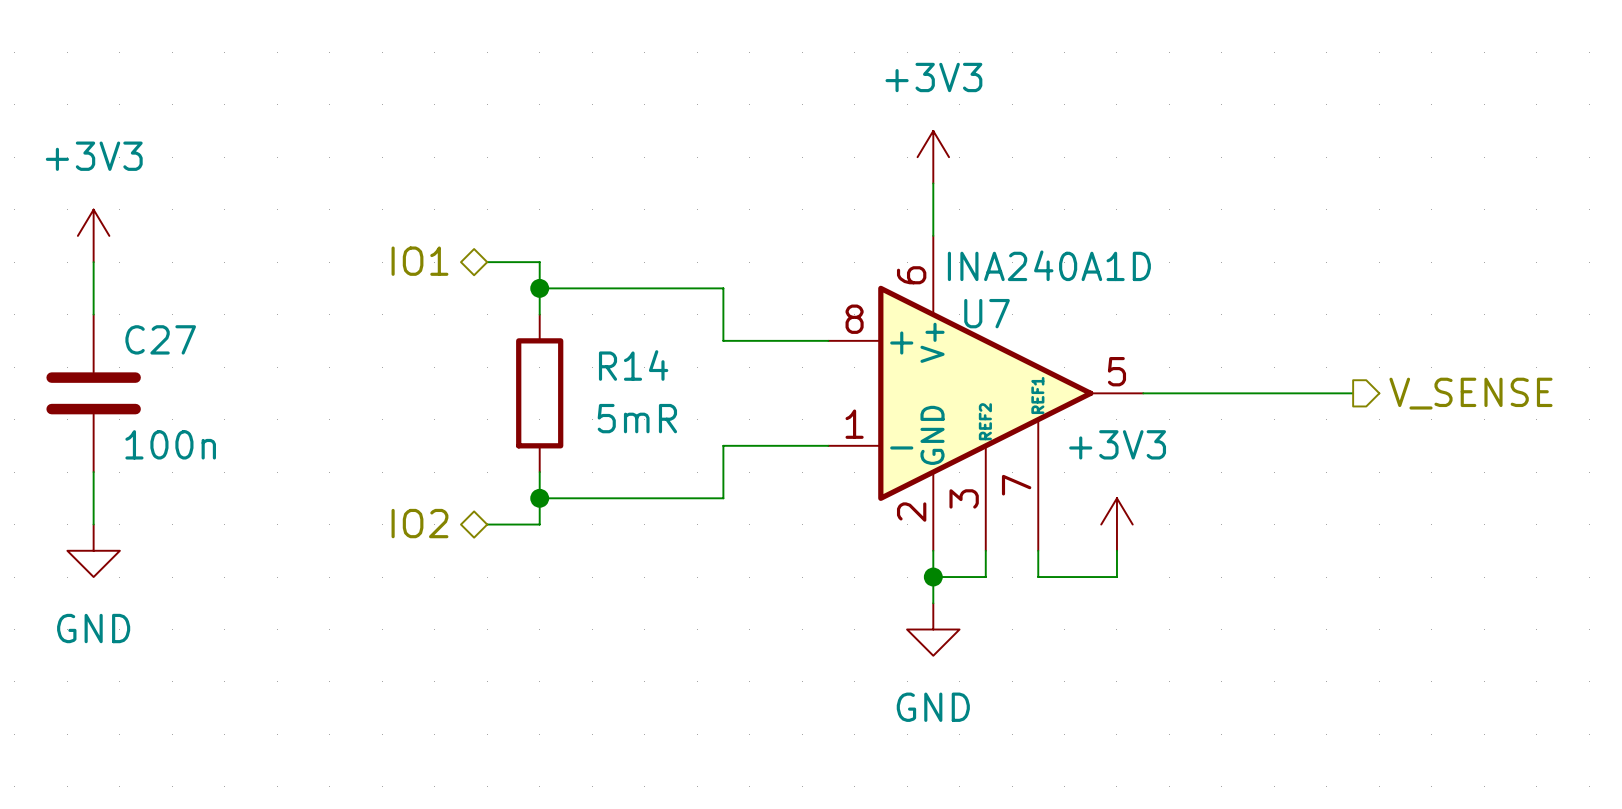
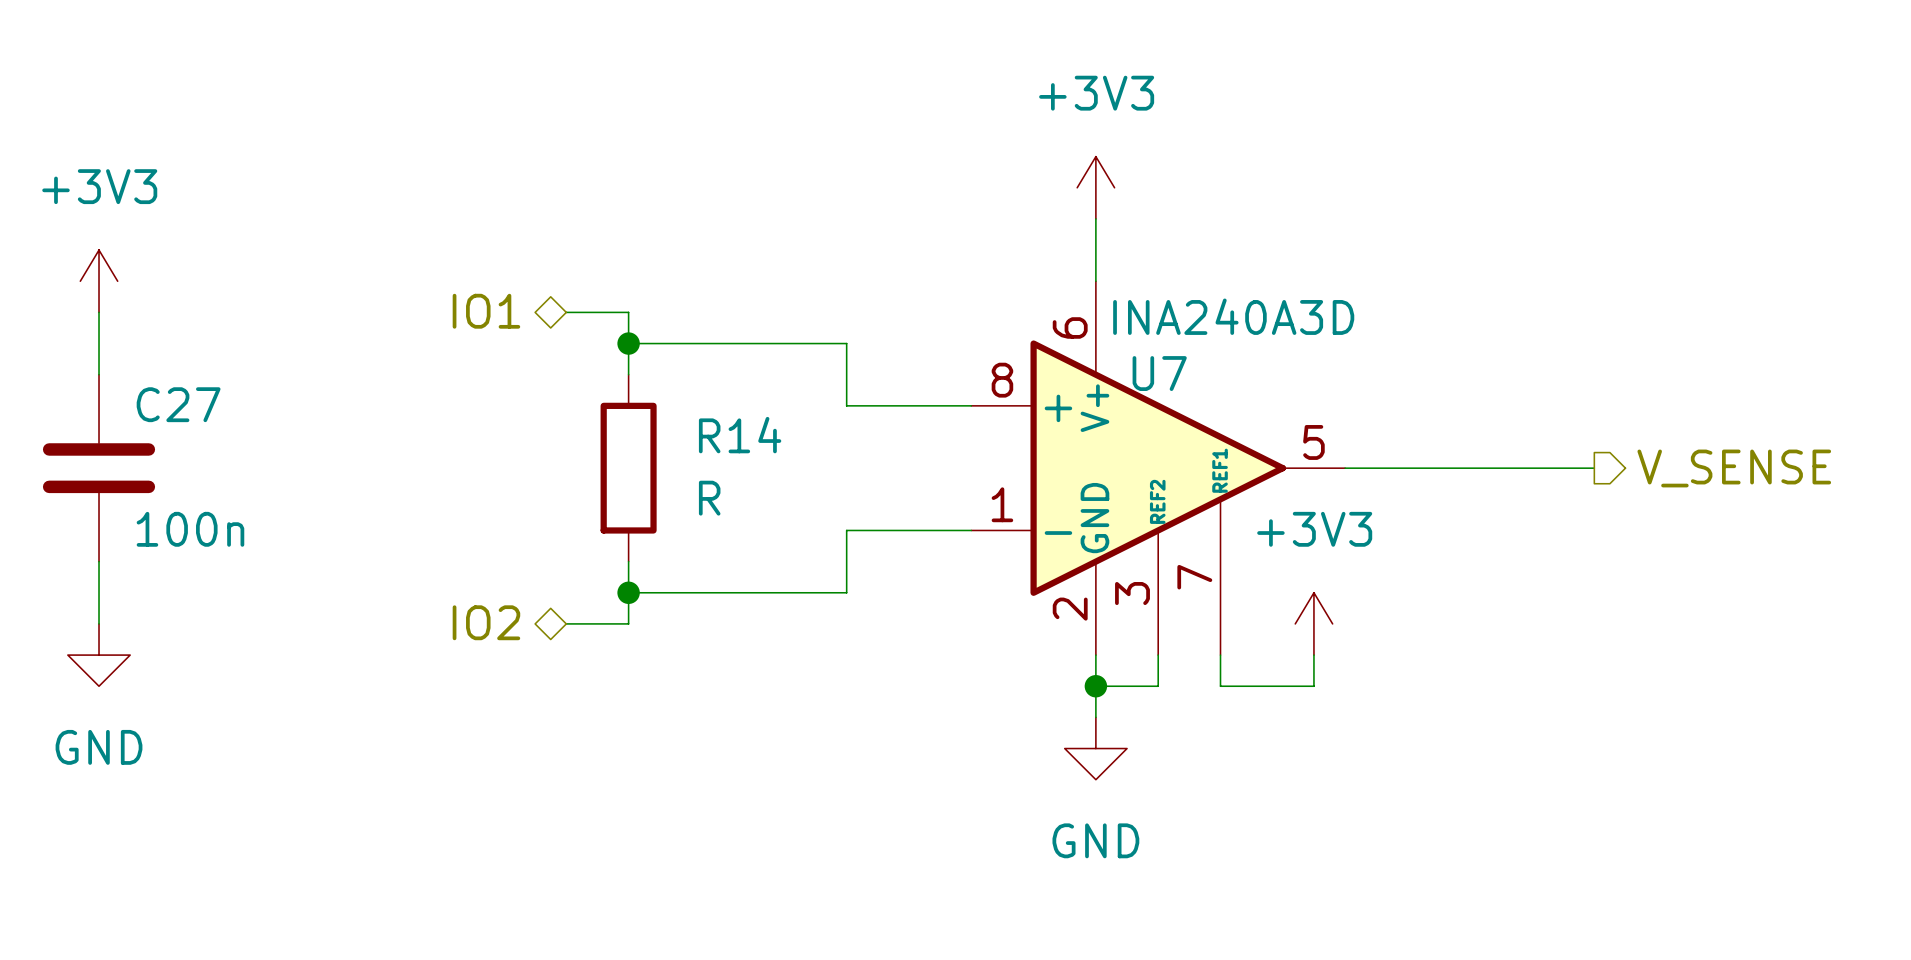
U7 value: INA240A1D (1049, 265) -> INA240A3D (1233, 316)
R14 value: 5mR (637, 418) -> R (709, 498)

